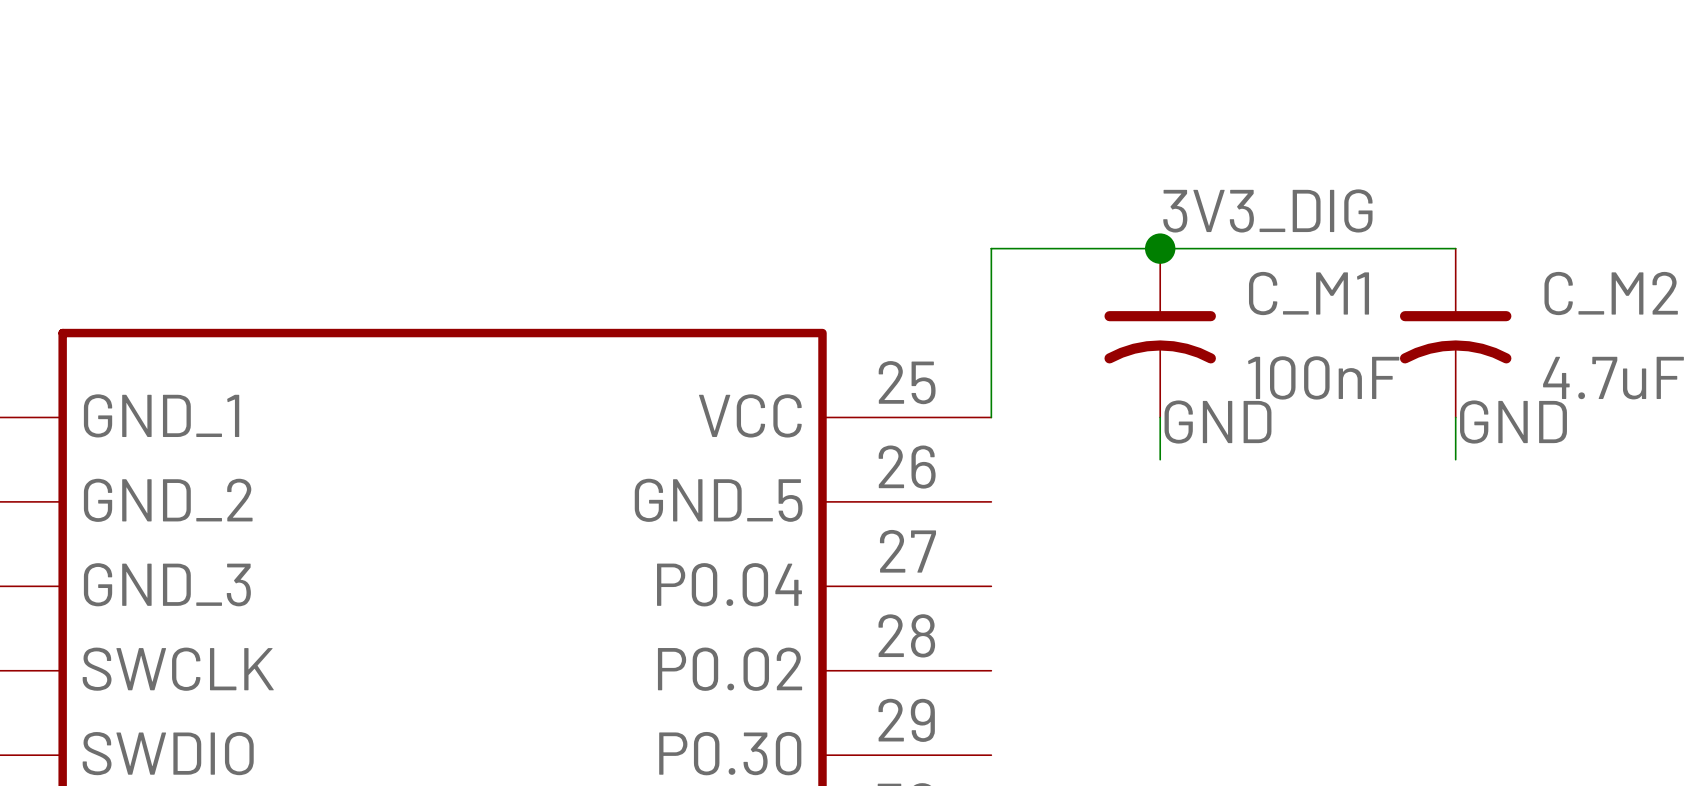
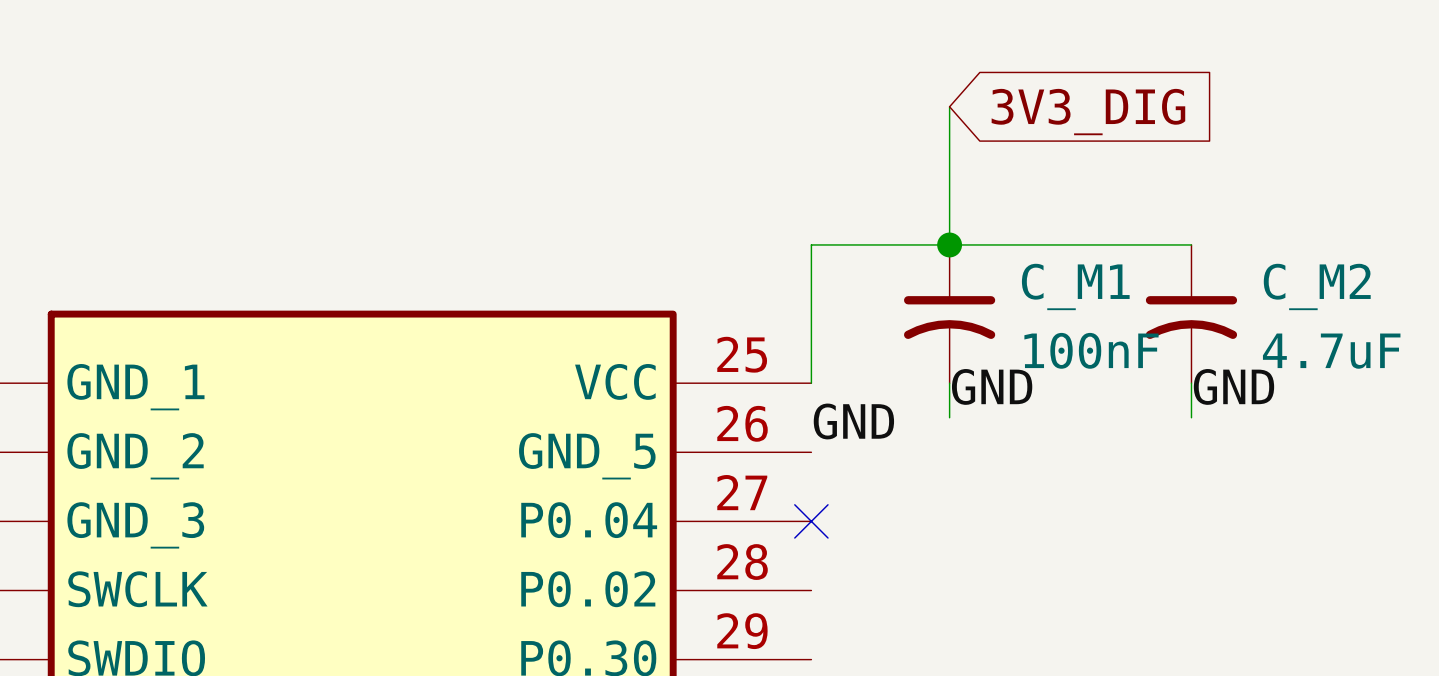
wire: none -> (949, 106) (949, 244)
global label: none -> 3V3_DIG (1088, 112)
label: 3V3_DIG (1267, 210) -> none
label: none -> GND (853, 421)
no-connect mark: none -> (811, 521)

